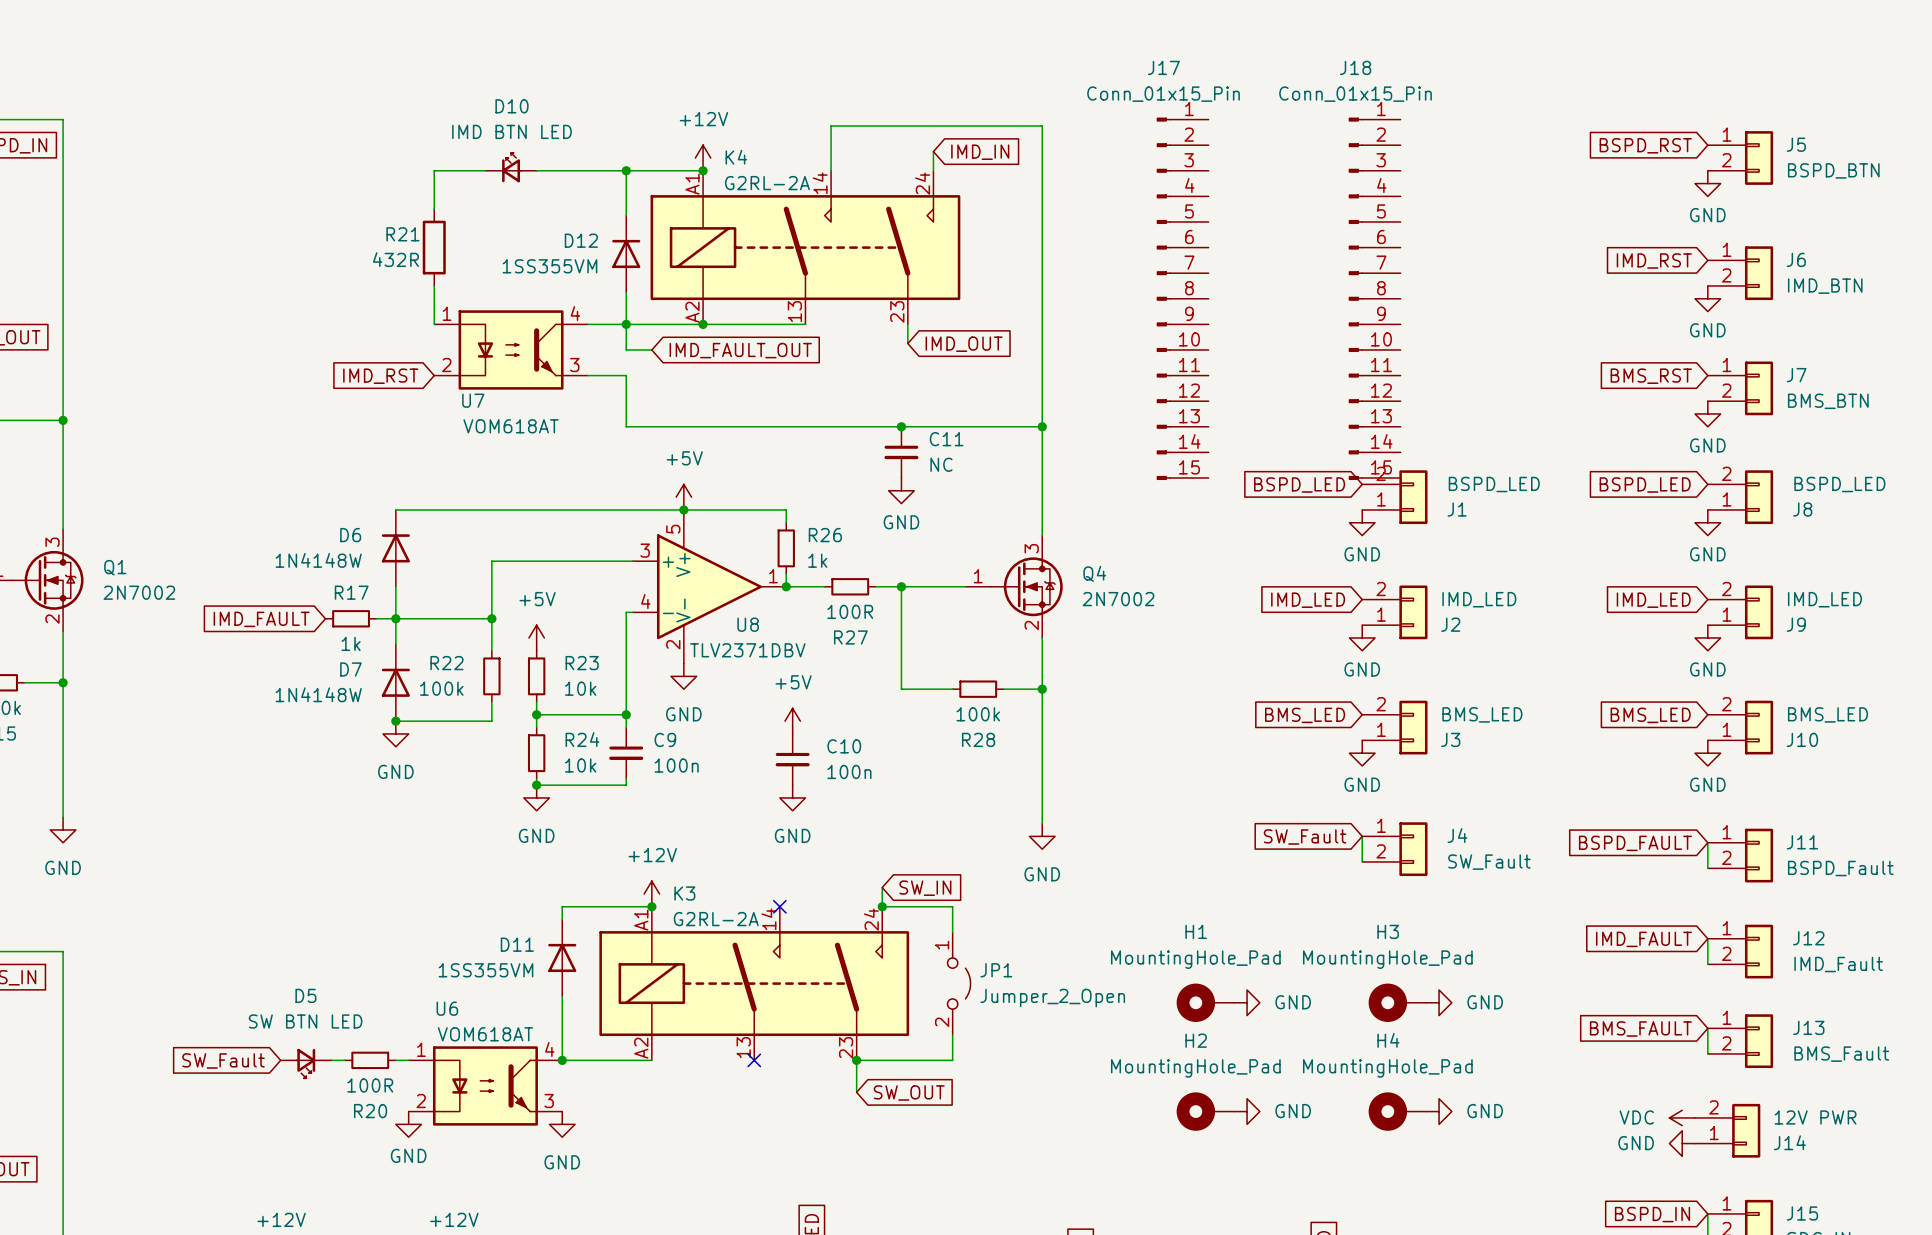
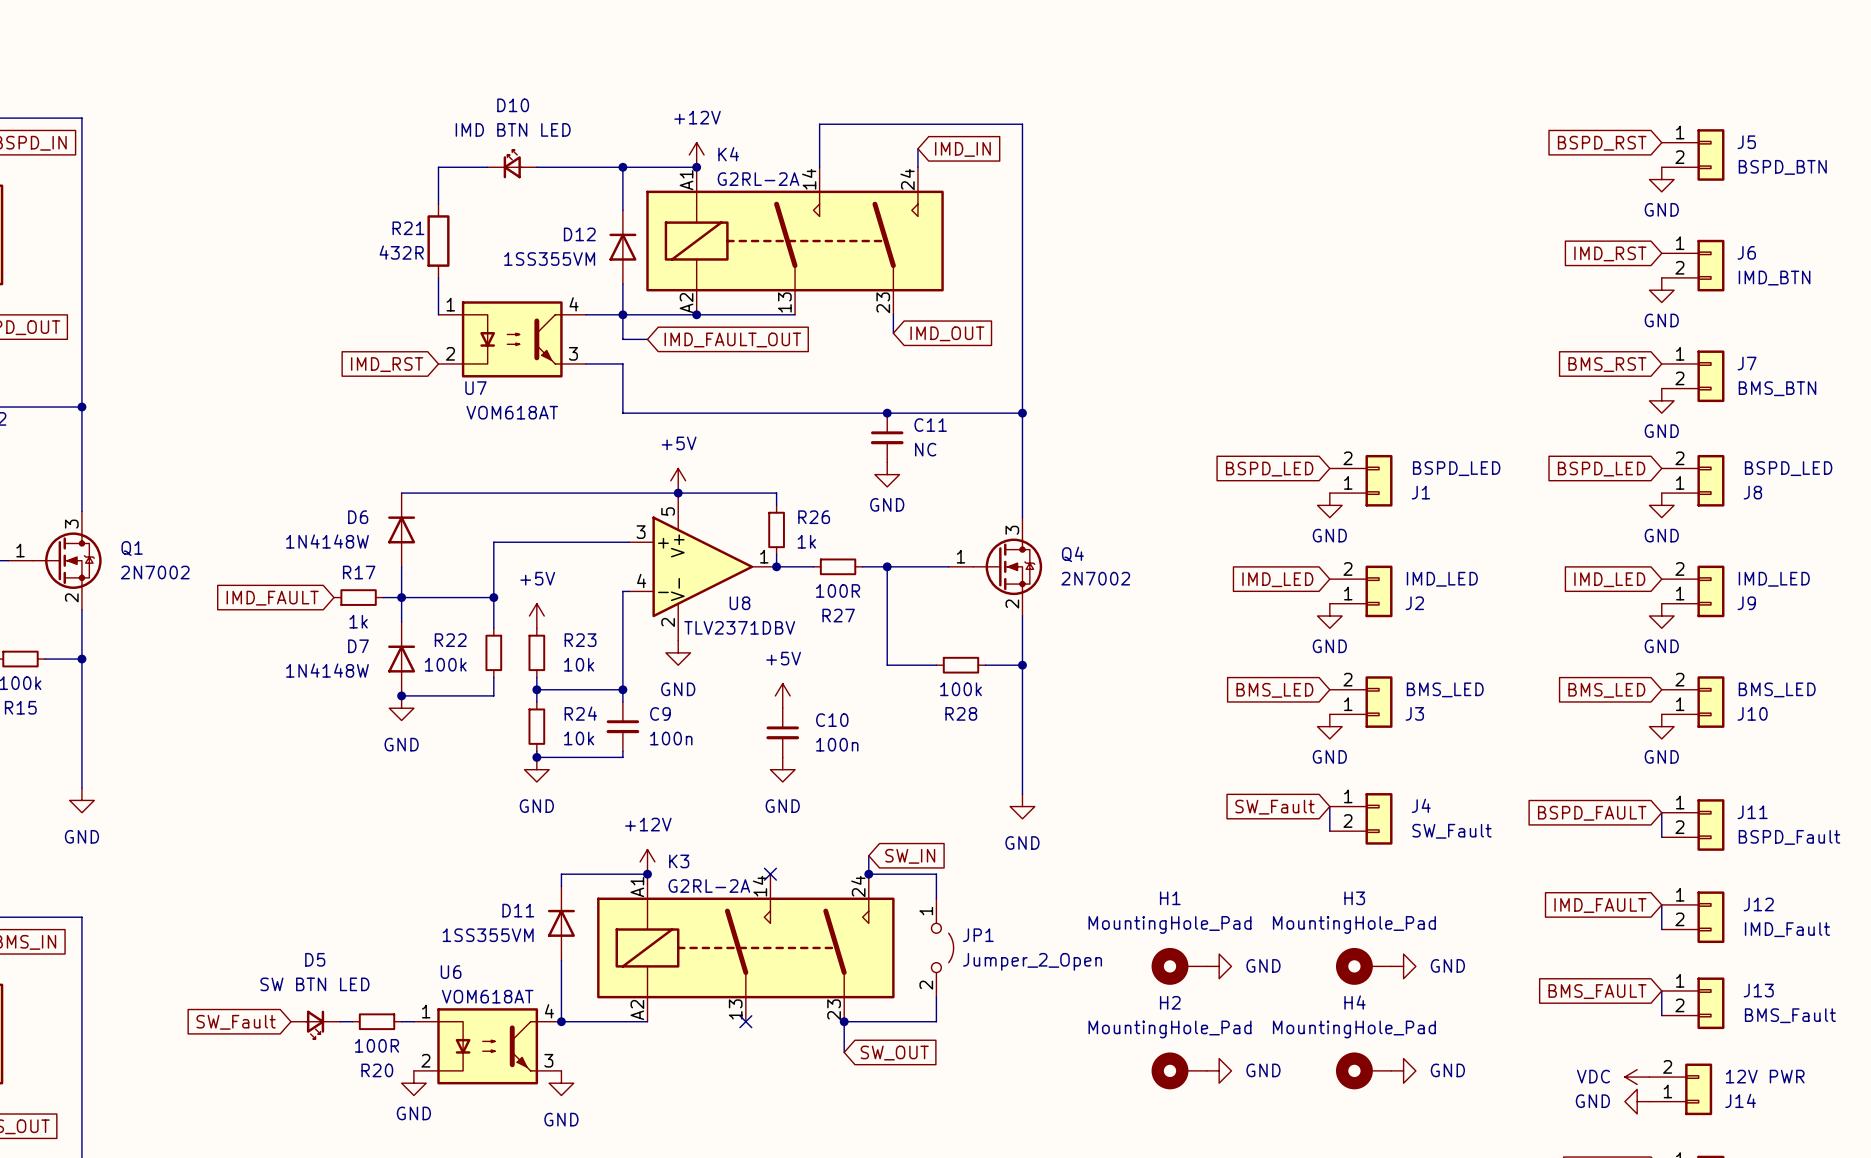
J17: Conn_01x15_Pin (1182, 298) -> none
J18: Conn_01x15_Pin (1374, 298) -> none

